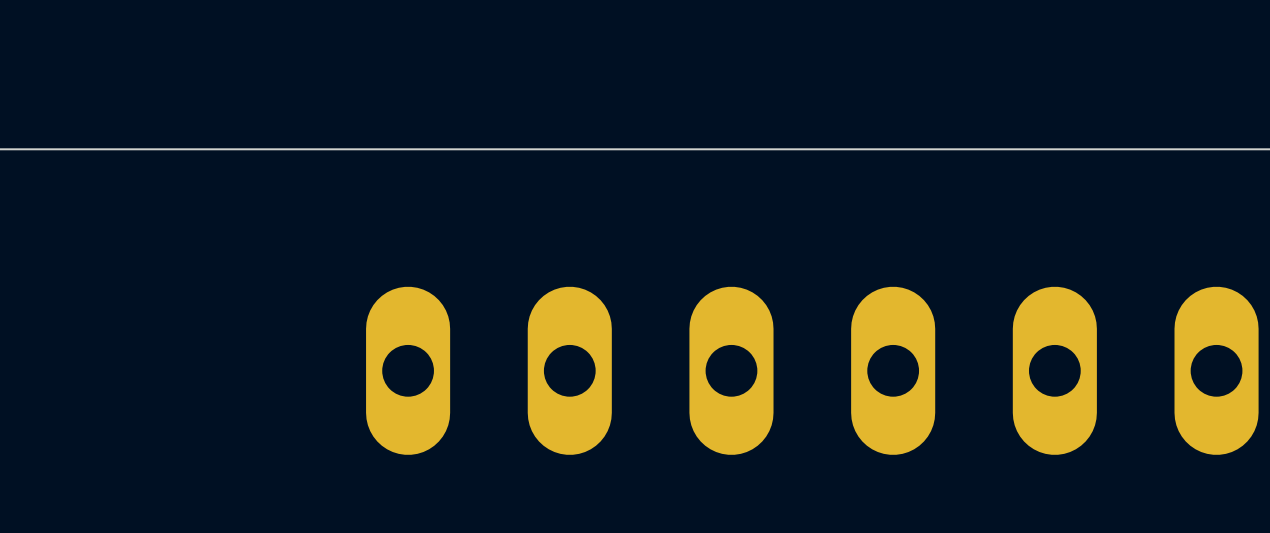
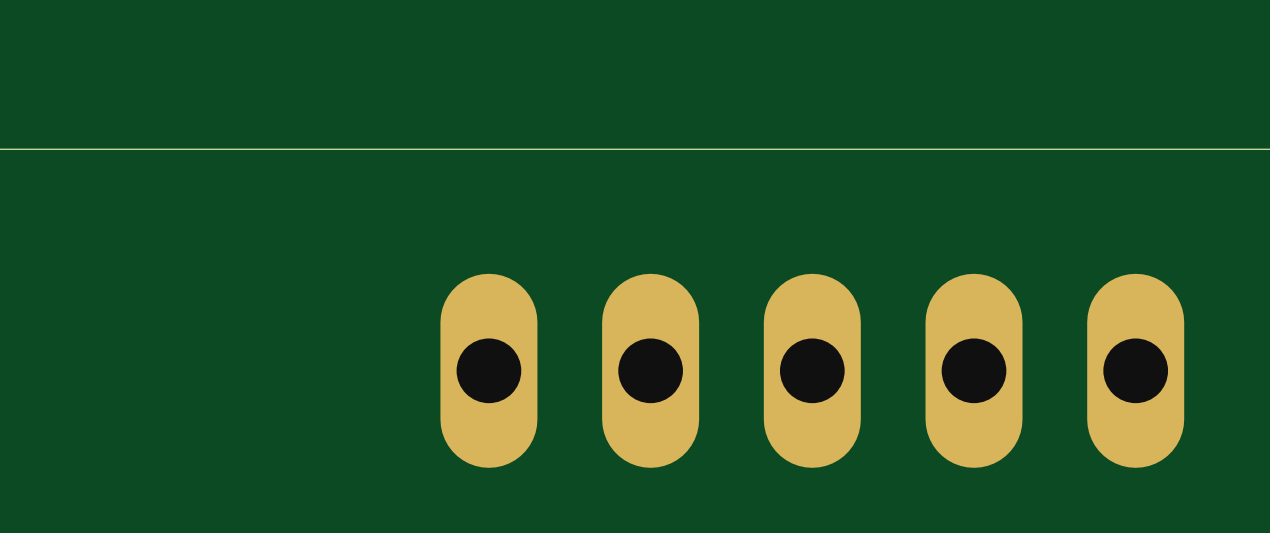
part footprint: [366, 286, 1259, 455] -> [440, 273, 1185, 468]

